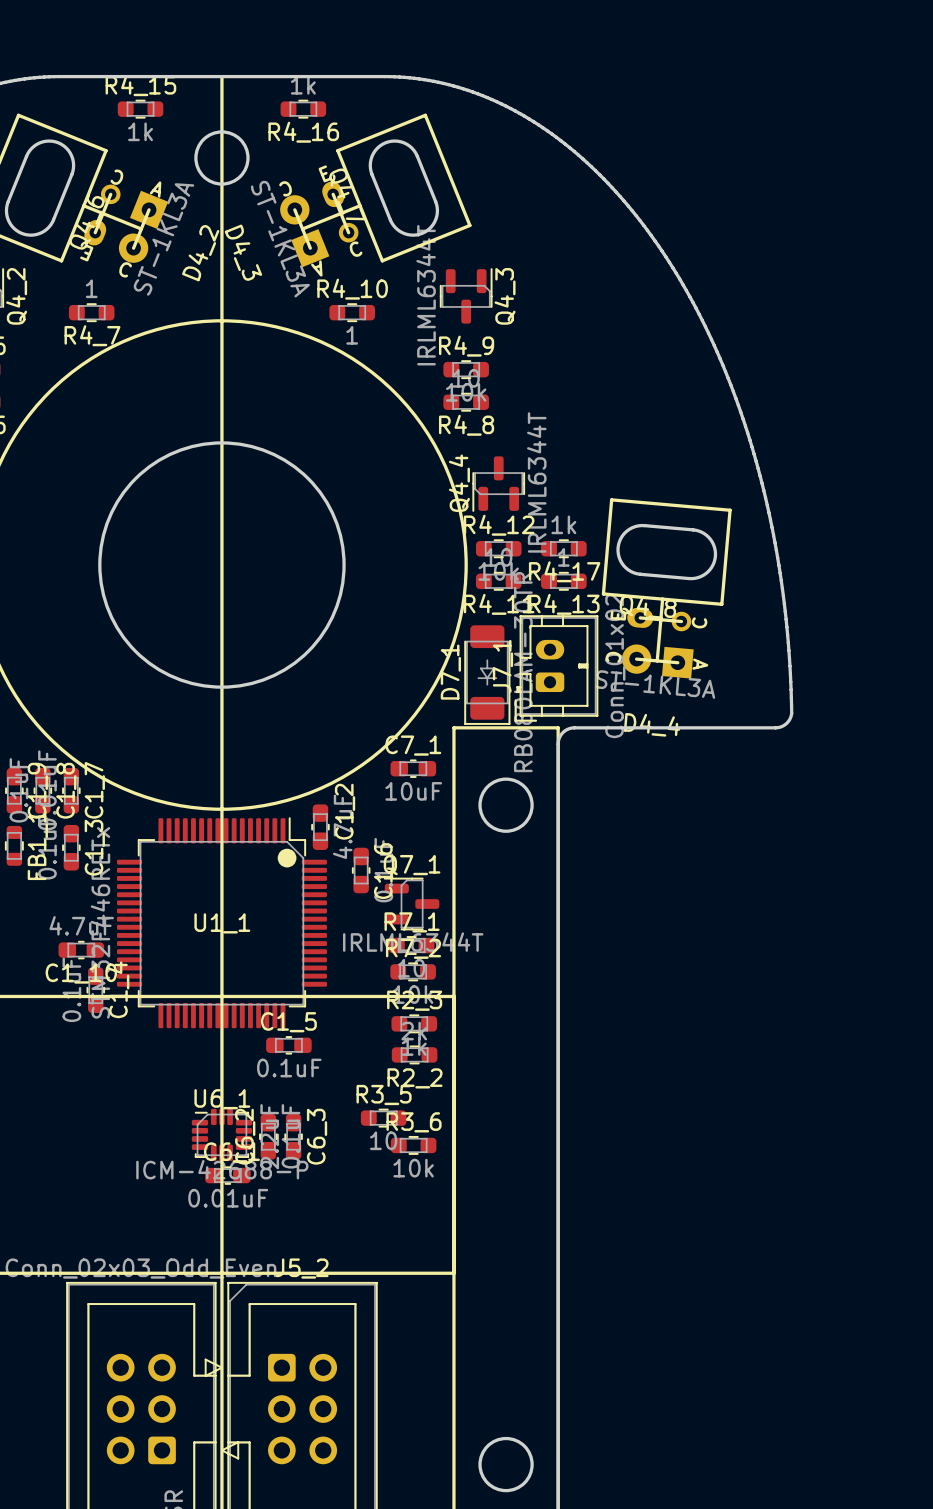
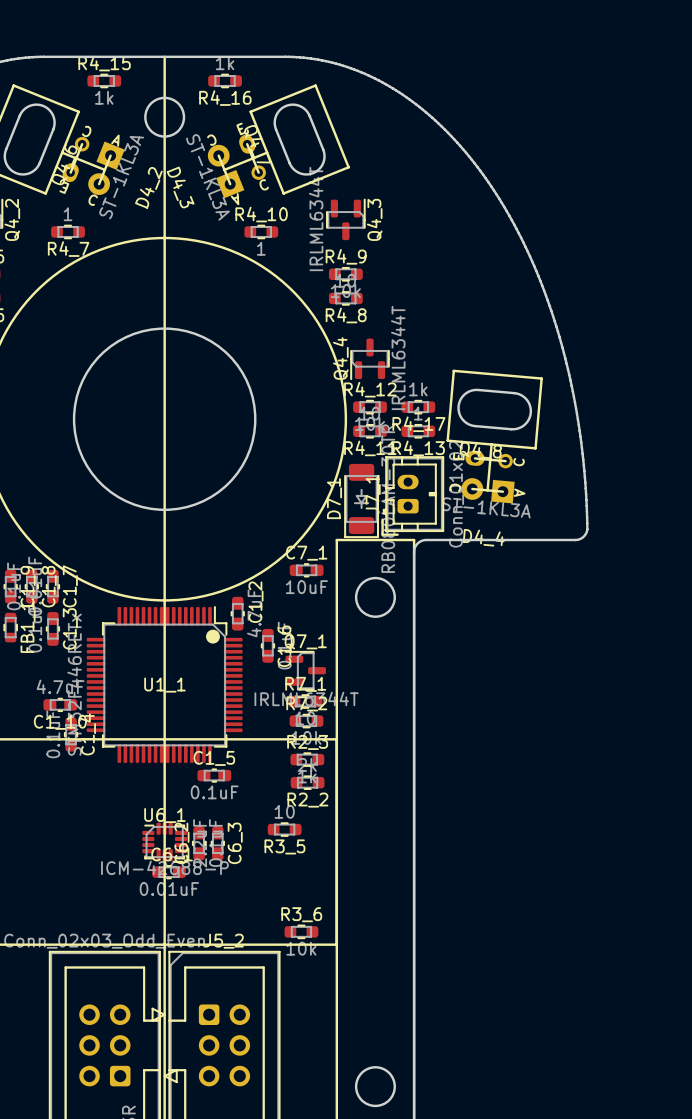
R3_5 name position: R3_5 (384, 1094) -> R3_5 (284, 846)
R3_5 value position: 10 (383, 1140) -> 10 (284, 811)
R3_6 position: (413, 1145) -> (301, 931)

